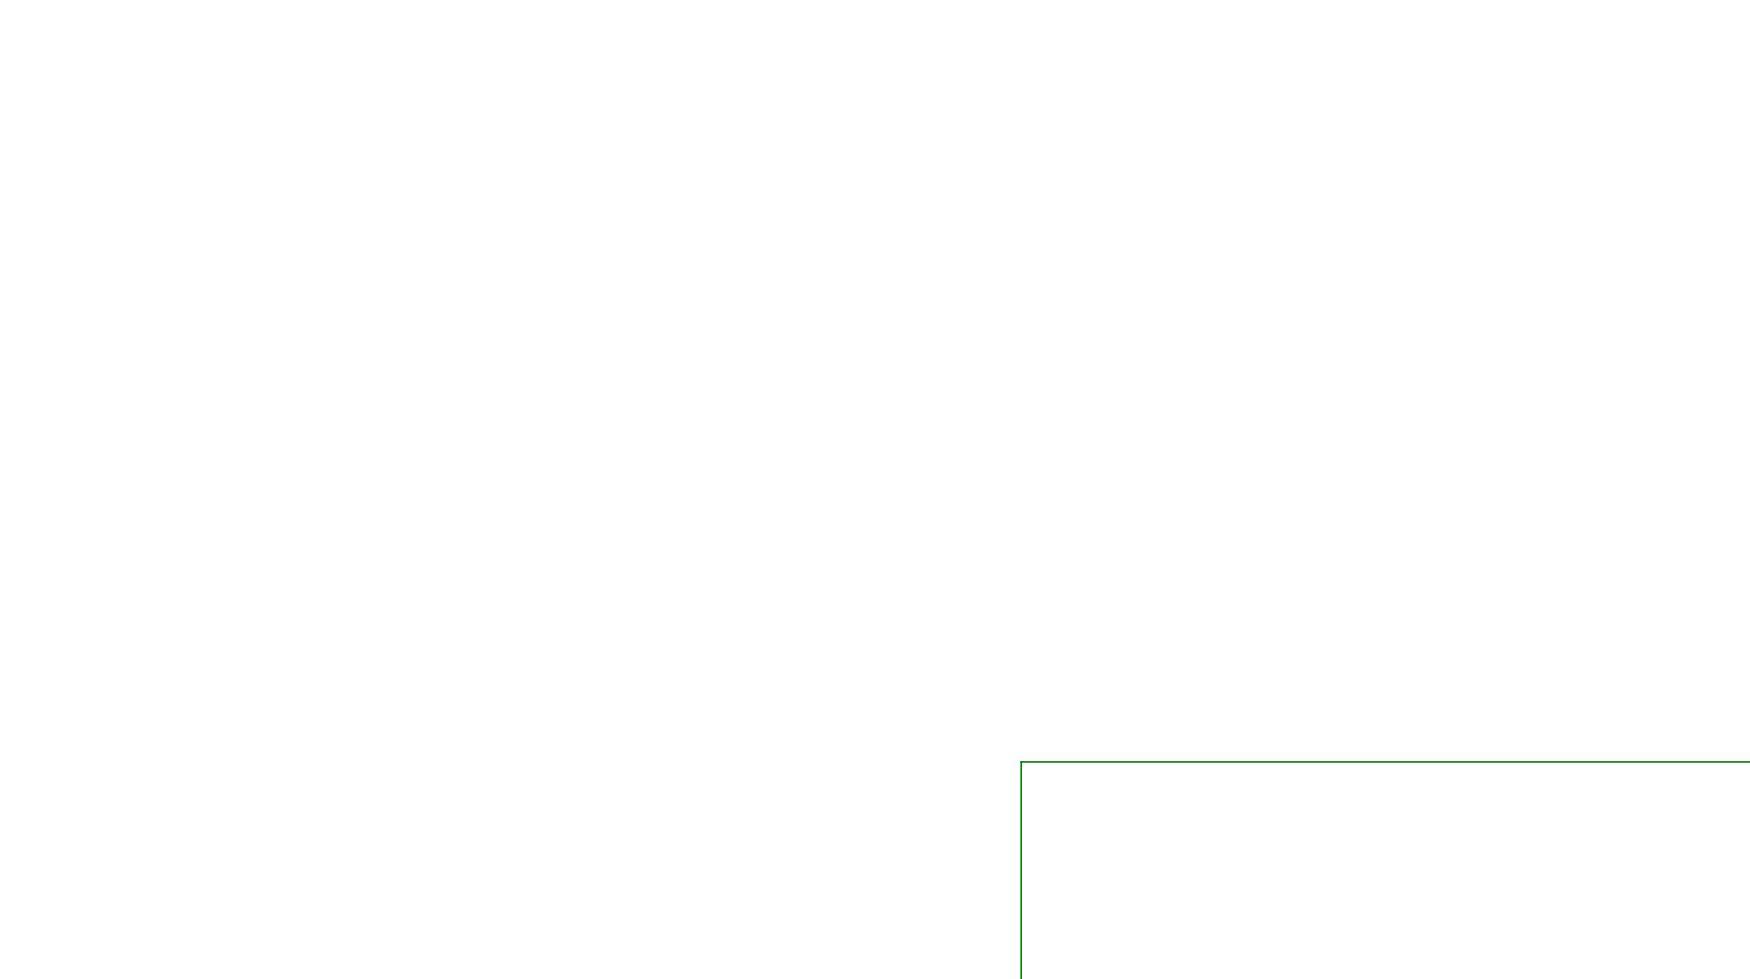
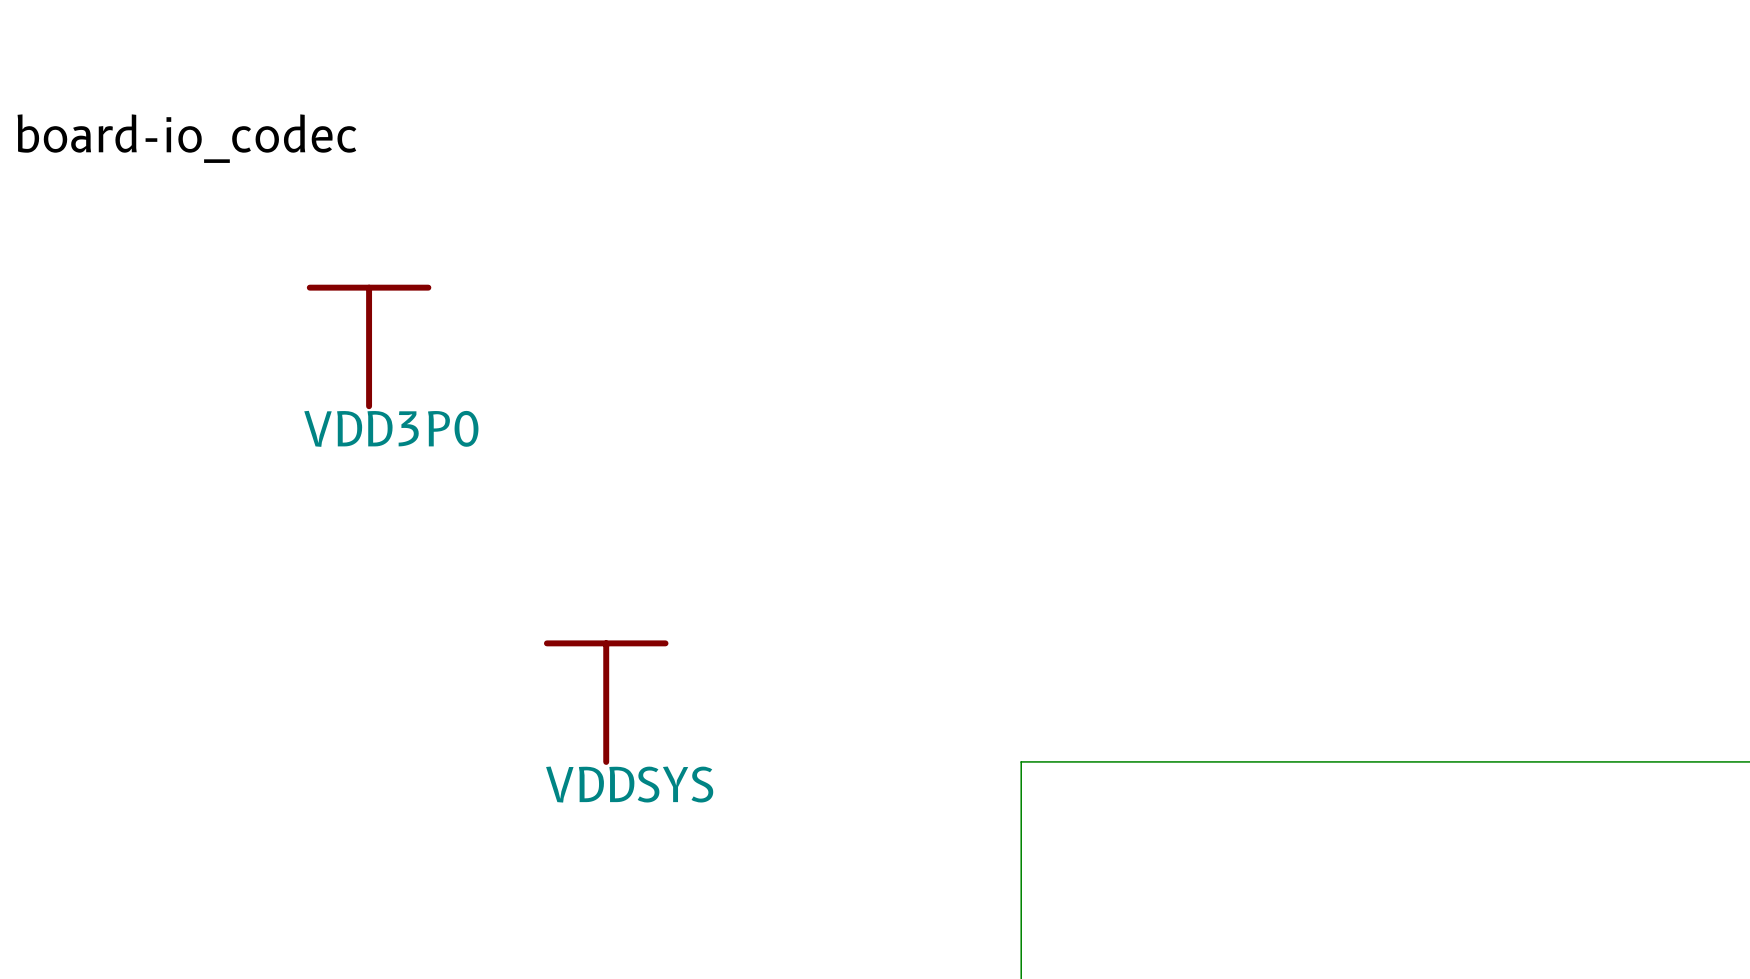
label: none -> board-io_codec (186, 138)
power symbol: none -> VDD3P0 (369, 346)
power symbol: none -> VDDSYS (606, 702)

